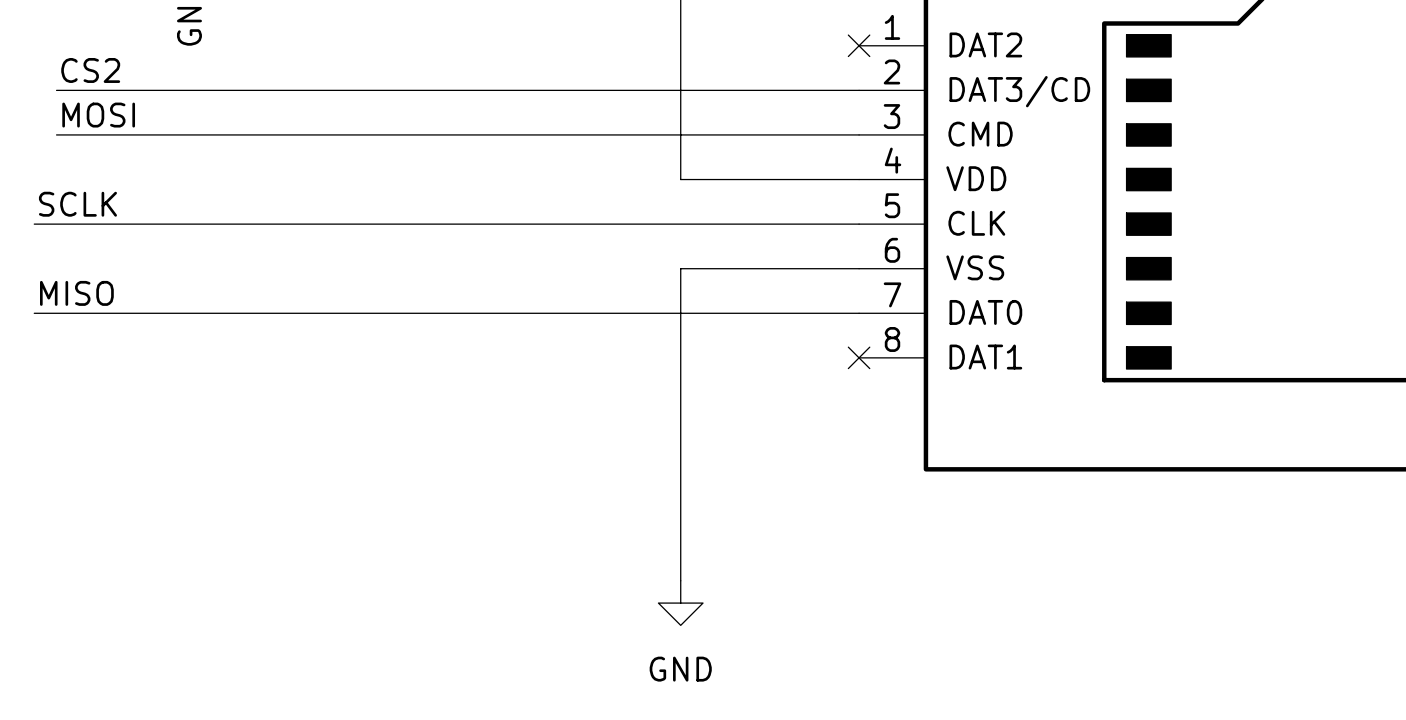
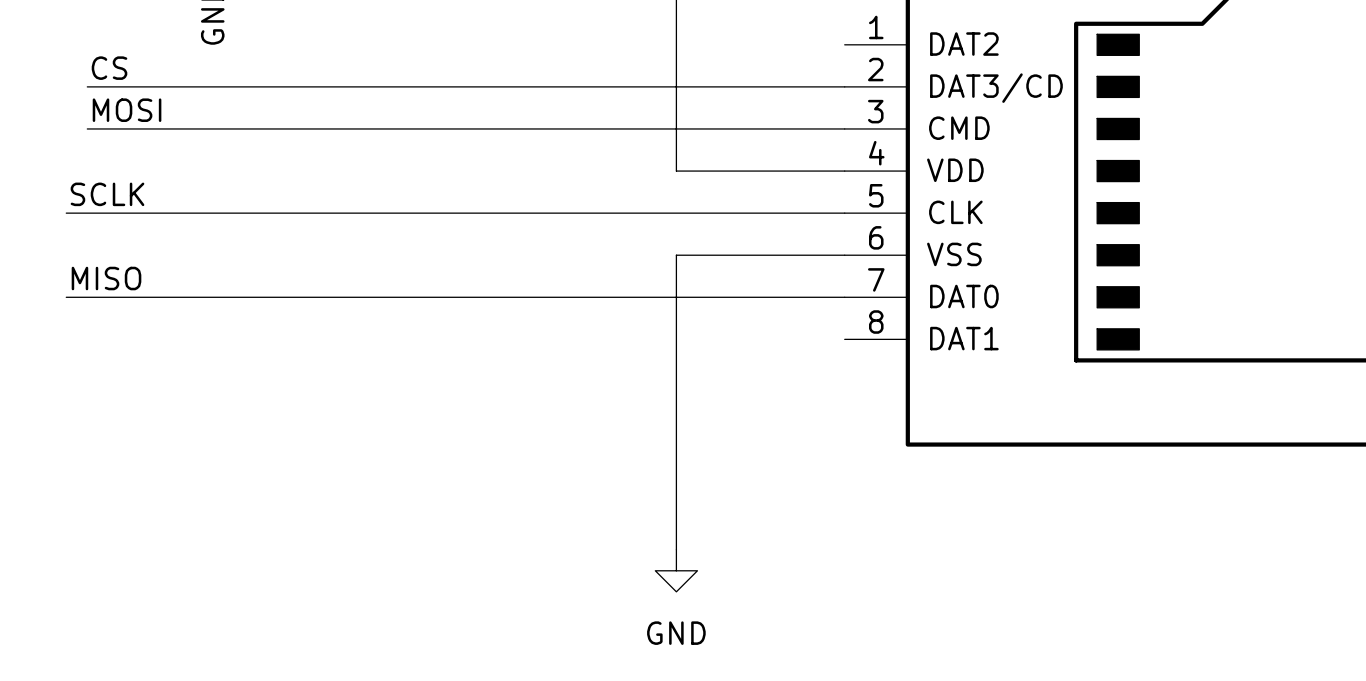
no-connect mark: (859, 45) -> none
label: CS2 (90, 70) -> CS (109, 68)
no-connect mark: (859, 357) -> none

